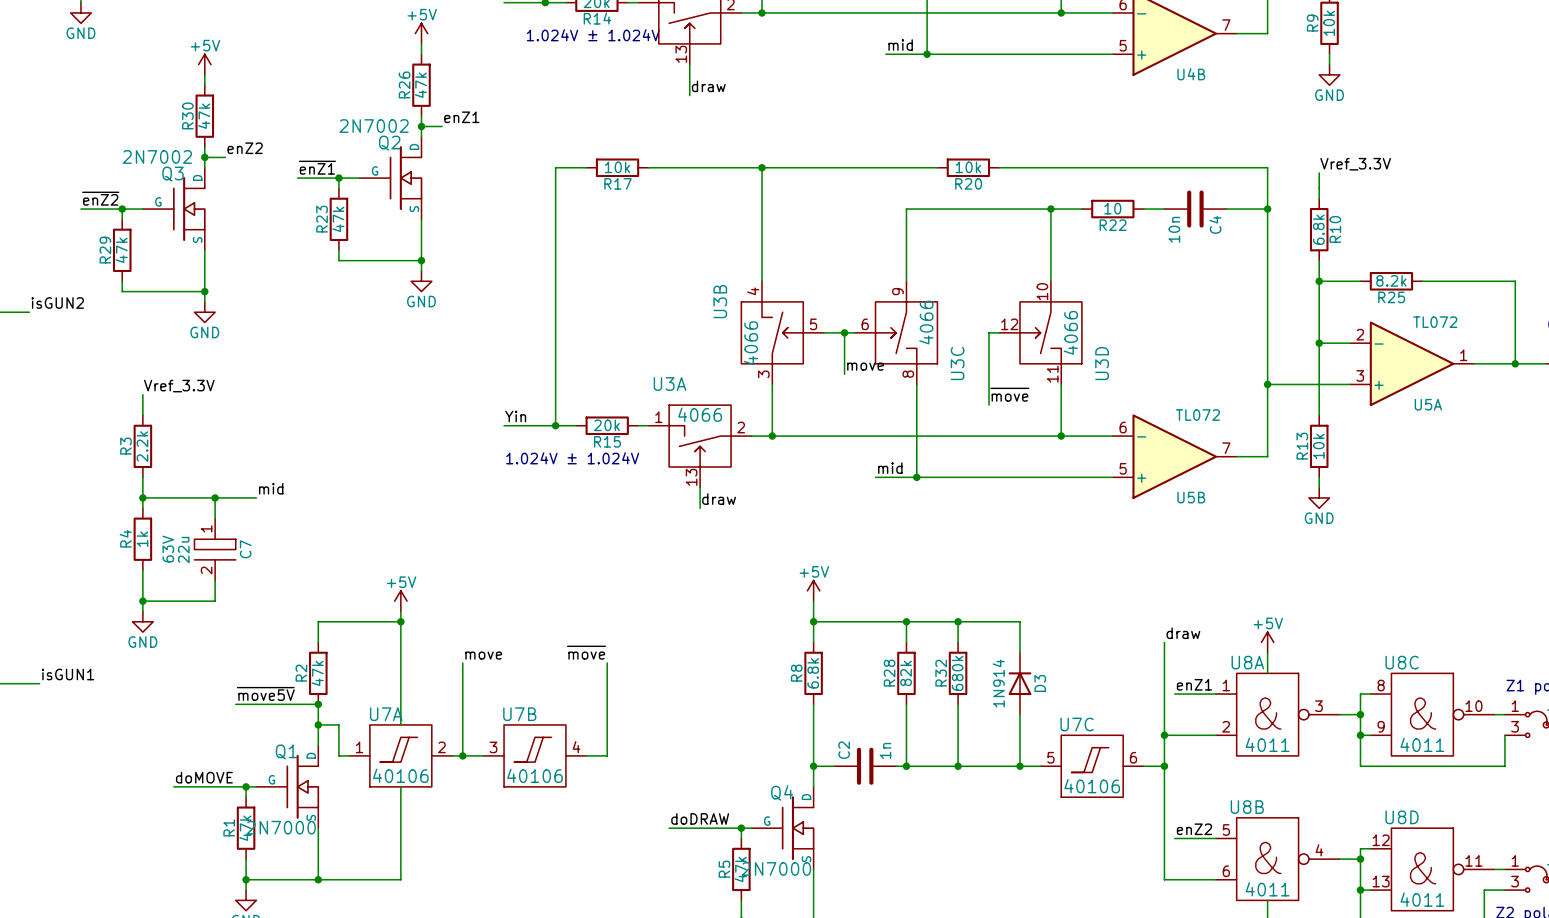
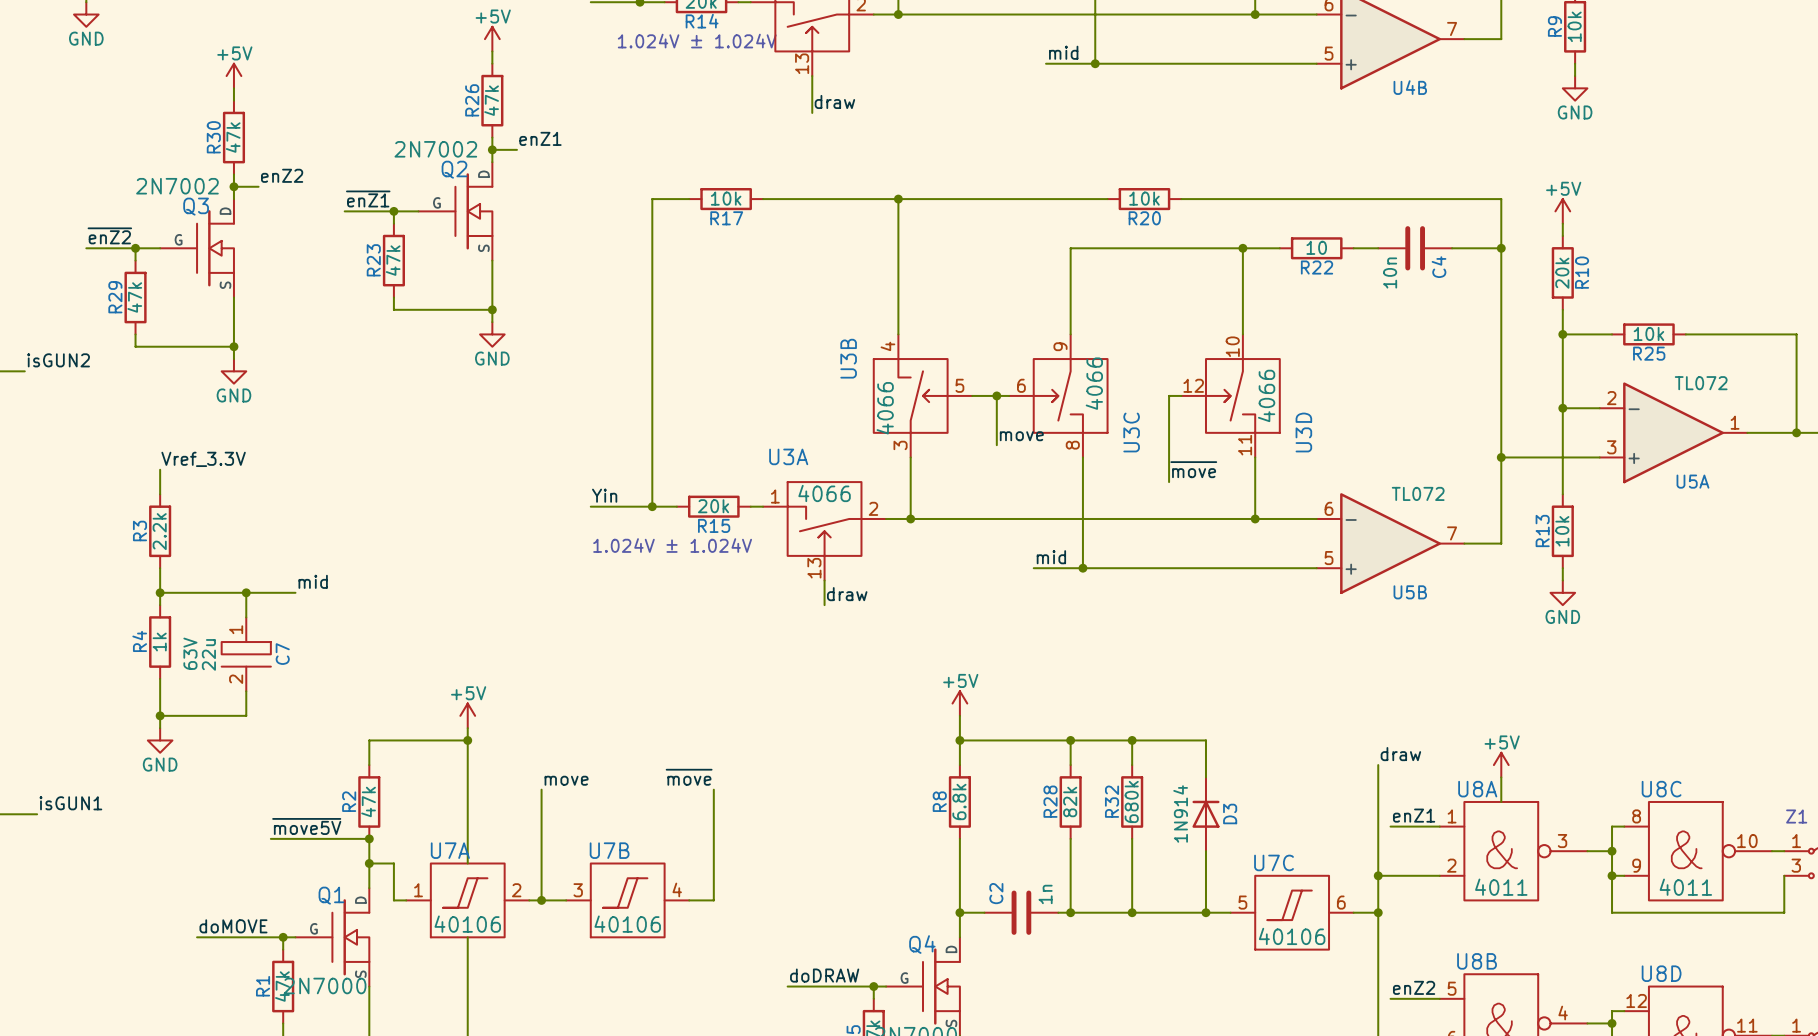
label: Vref_3.3V (1355, 164) -> none
power symbol: none -> +5V (1562, 211)
R10 value: 6.8k (1318, 229) -> 20k (1562, 273)
R25 value: 8.2k (1391, 280) -> 10k (1648, 333)

